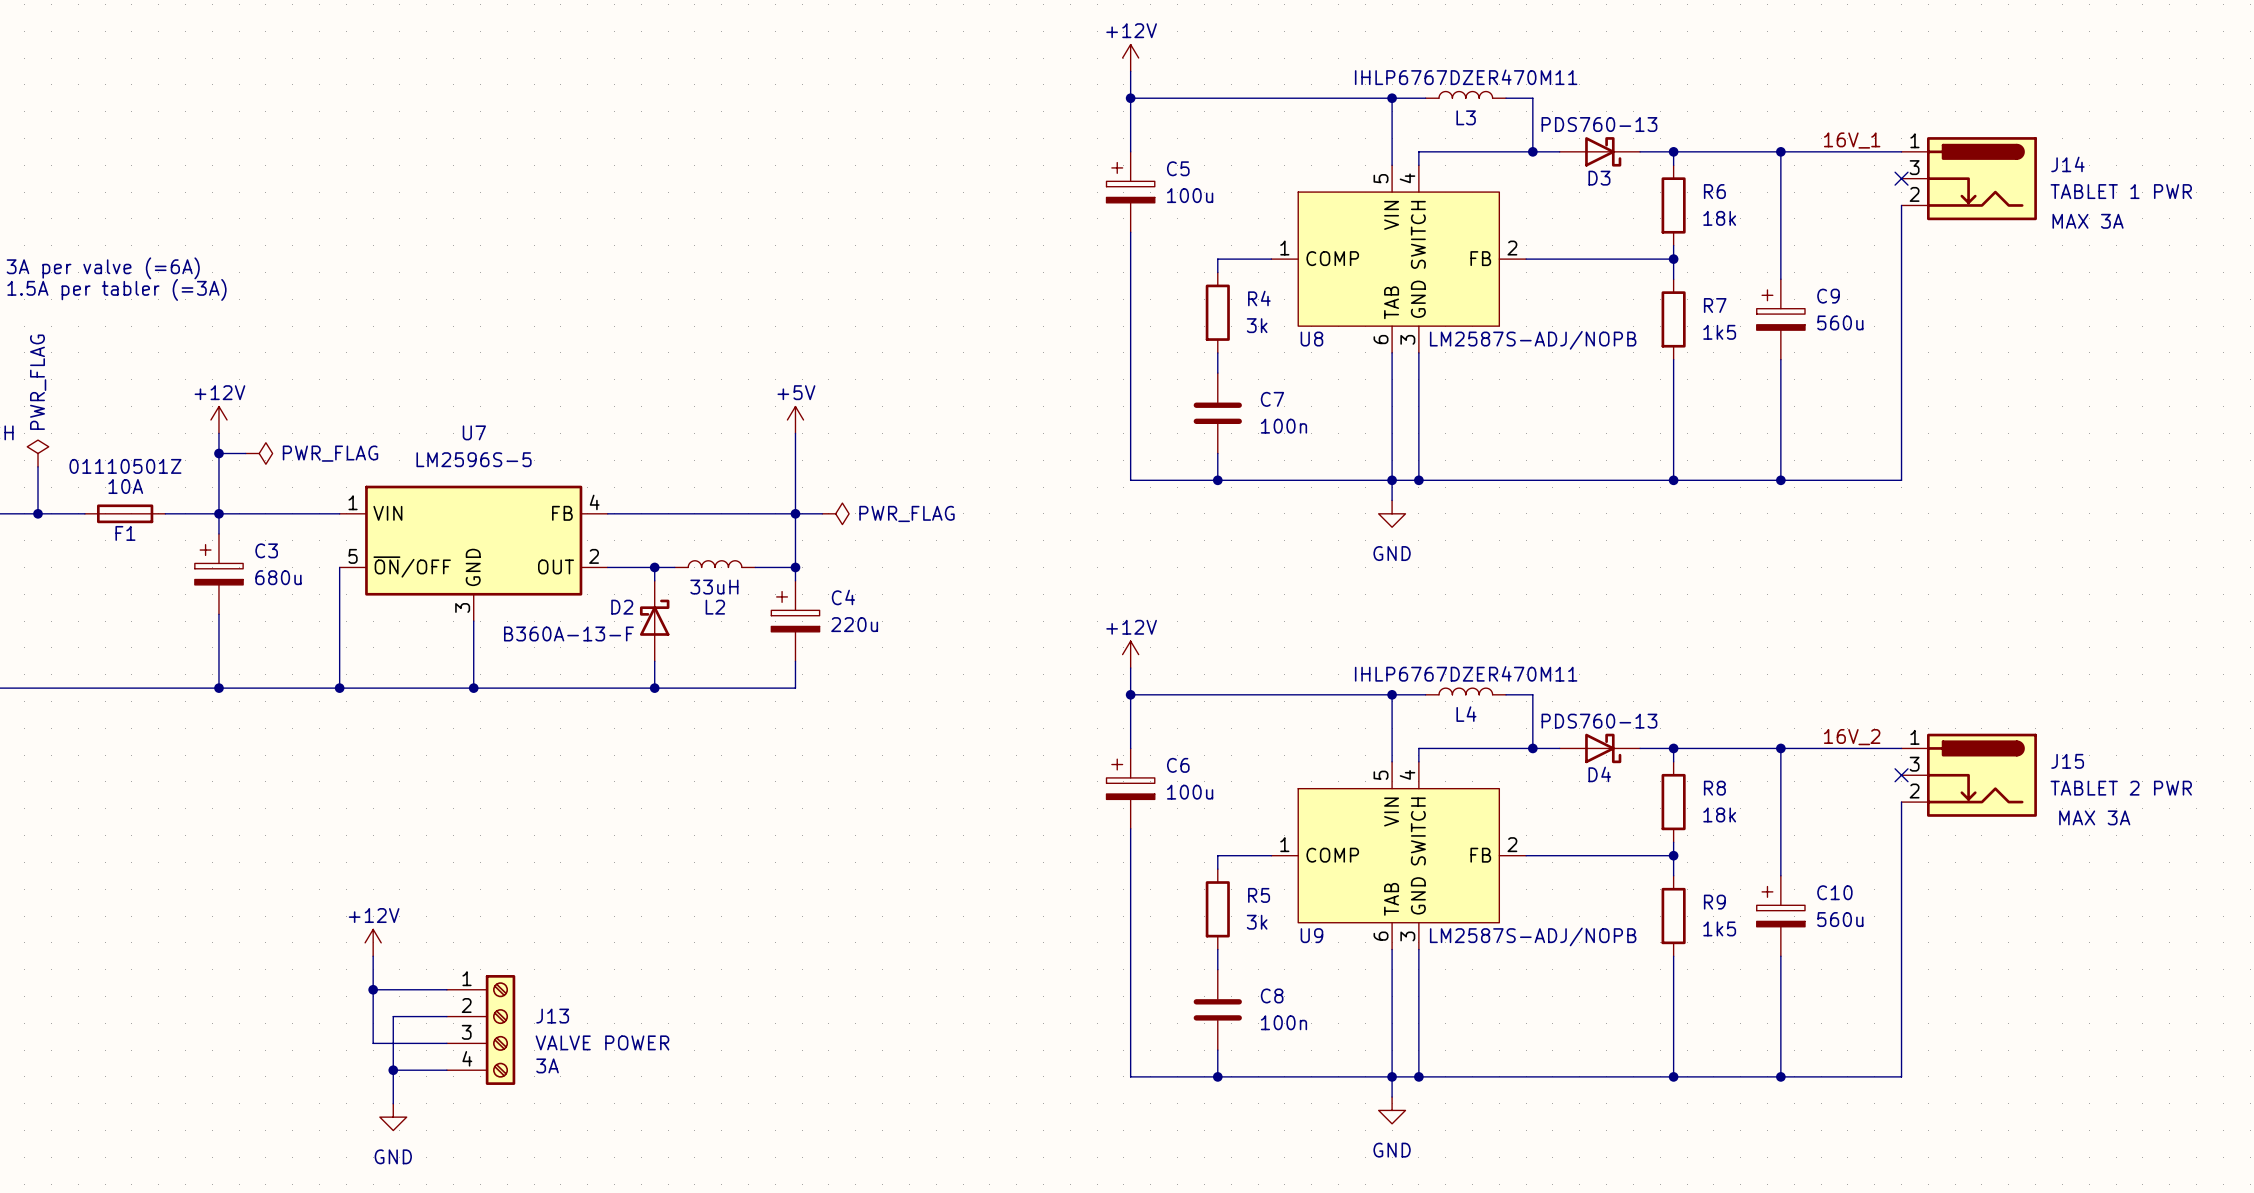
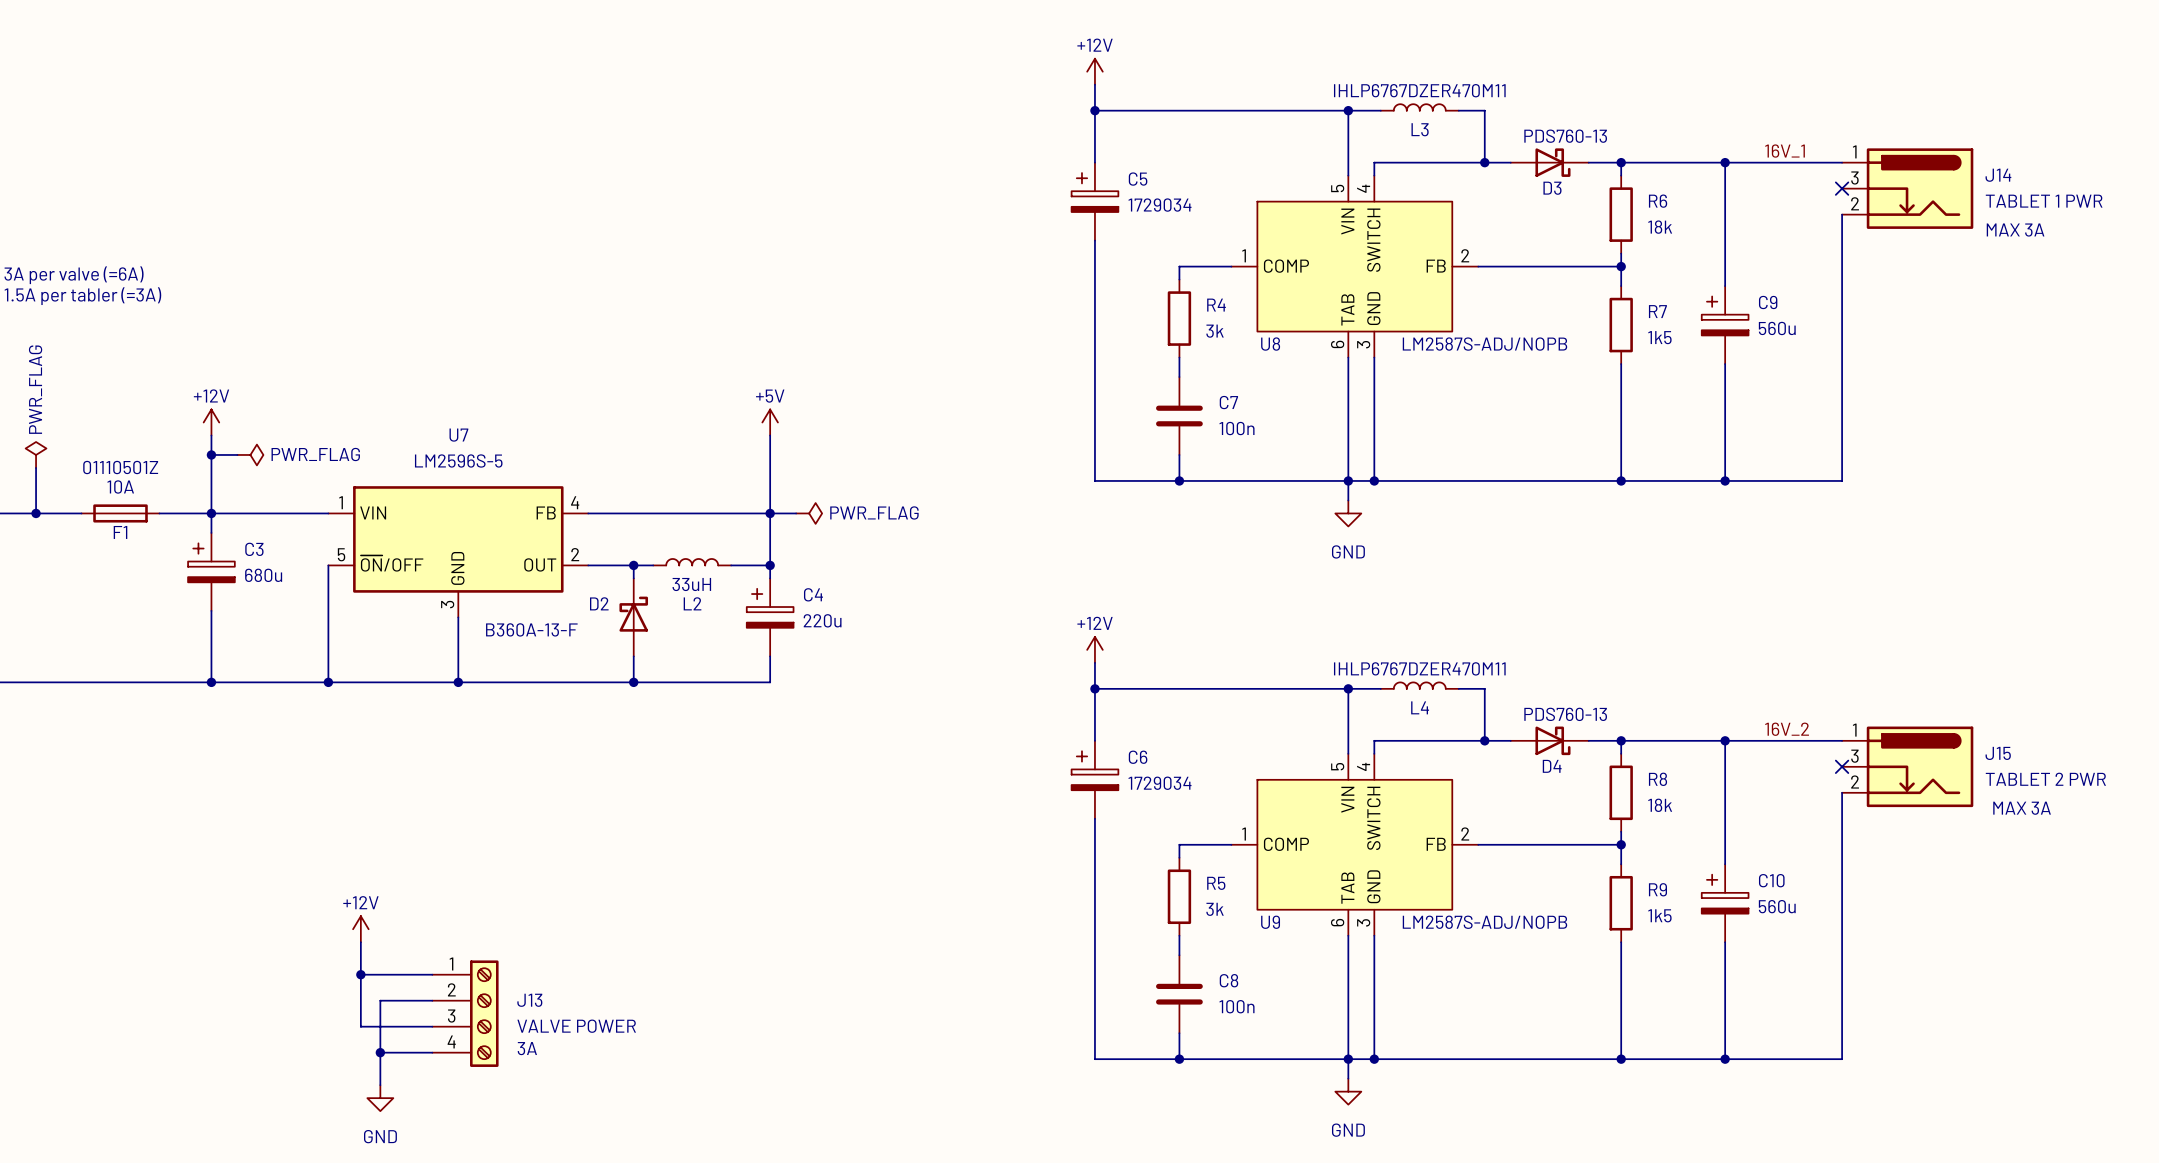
C5 value: 100u (1190, 195) -> 1729034 (1160, 205)
C6 value: 100u (1190, 792) -> 1729034 (1160, 783)

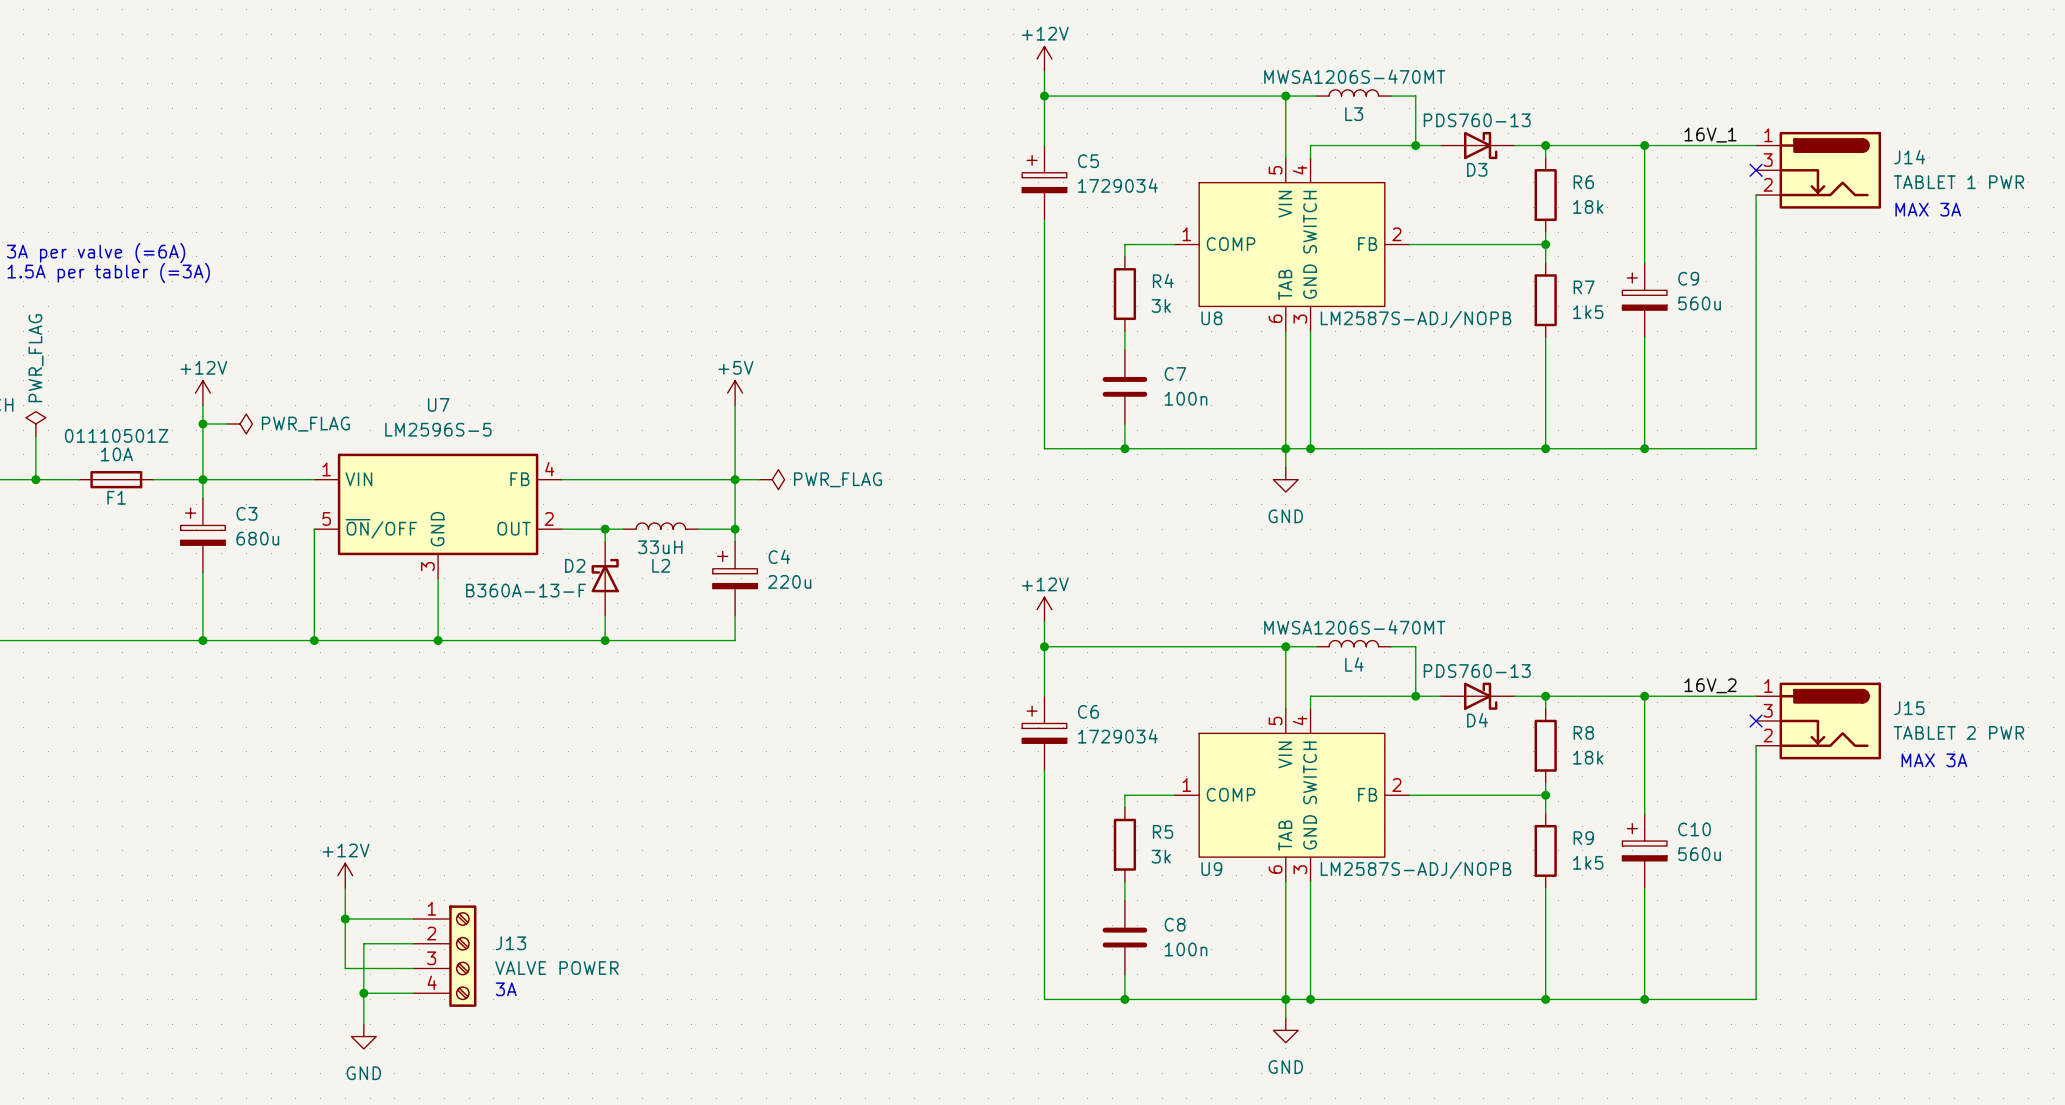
L3 value: IHLP6767DZER470M11 (1419, 90) -> MWSA1206S-470MT (1354, 76)
L4 value: IHLP6767DZER470M11 (1419, 668) -> MWSA1206S-470MT (1354, 627)

